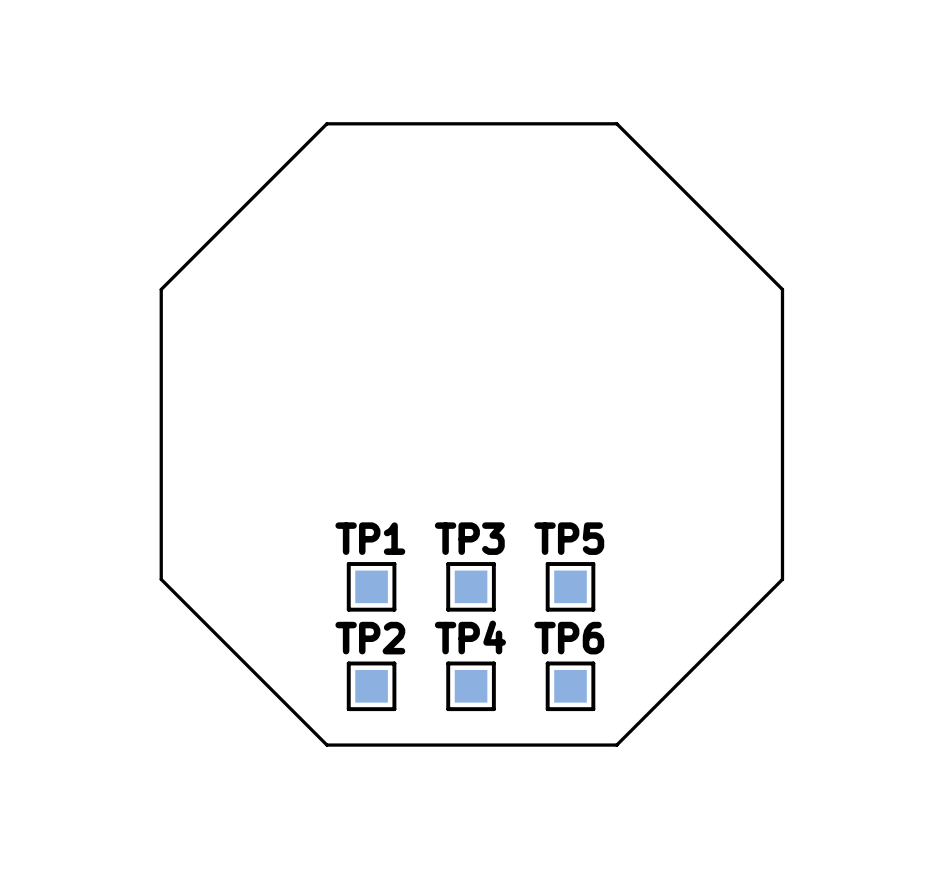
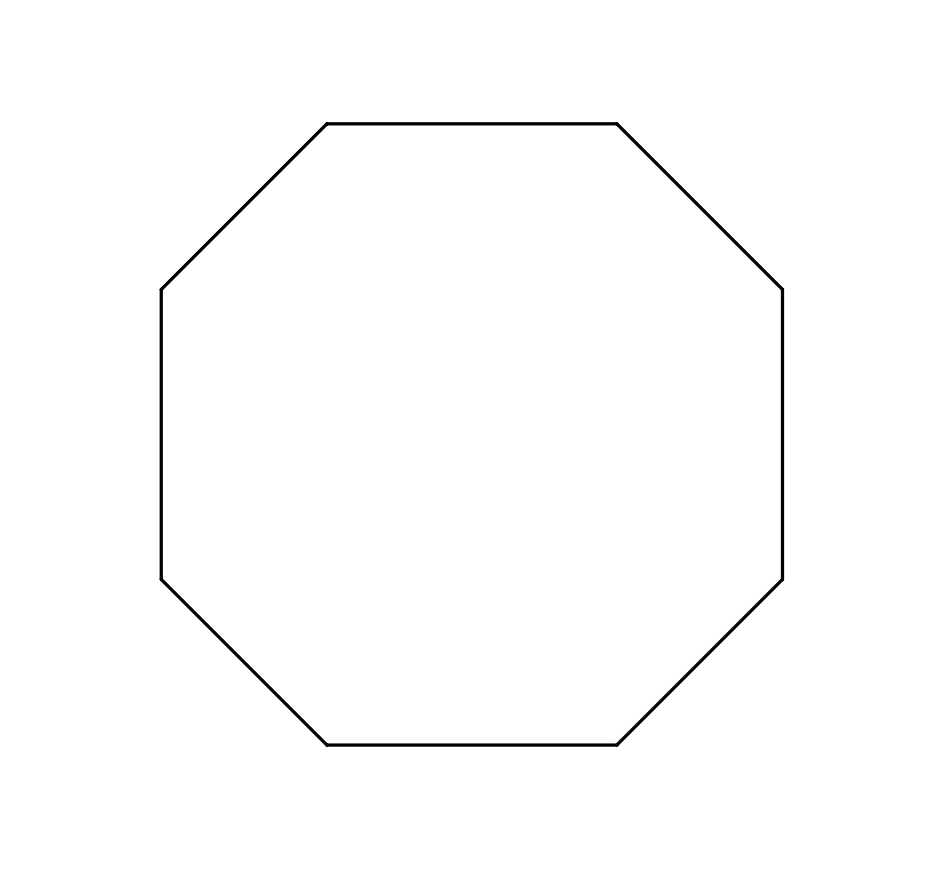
TP1: (371, 586) -> none
TP3: (471, 586) -> none
TP5: (570, 586) -> none
TP2: (371, 686) -> none
TP4: (471, 686) -> none
TP6: (570, 686) -> none

